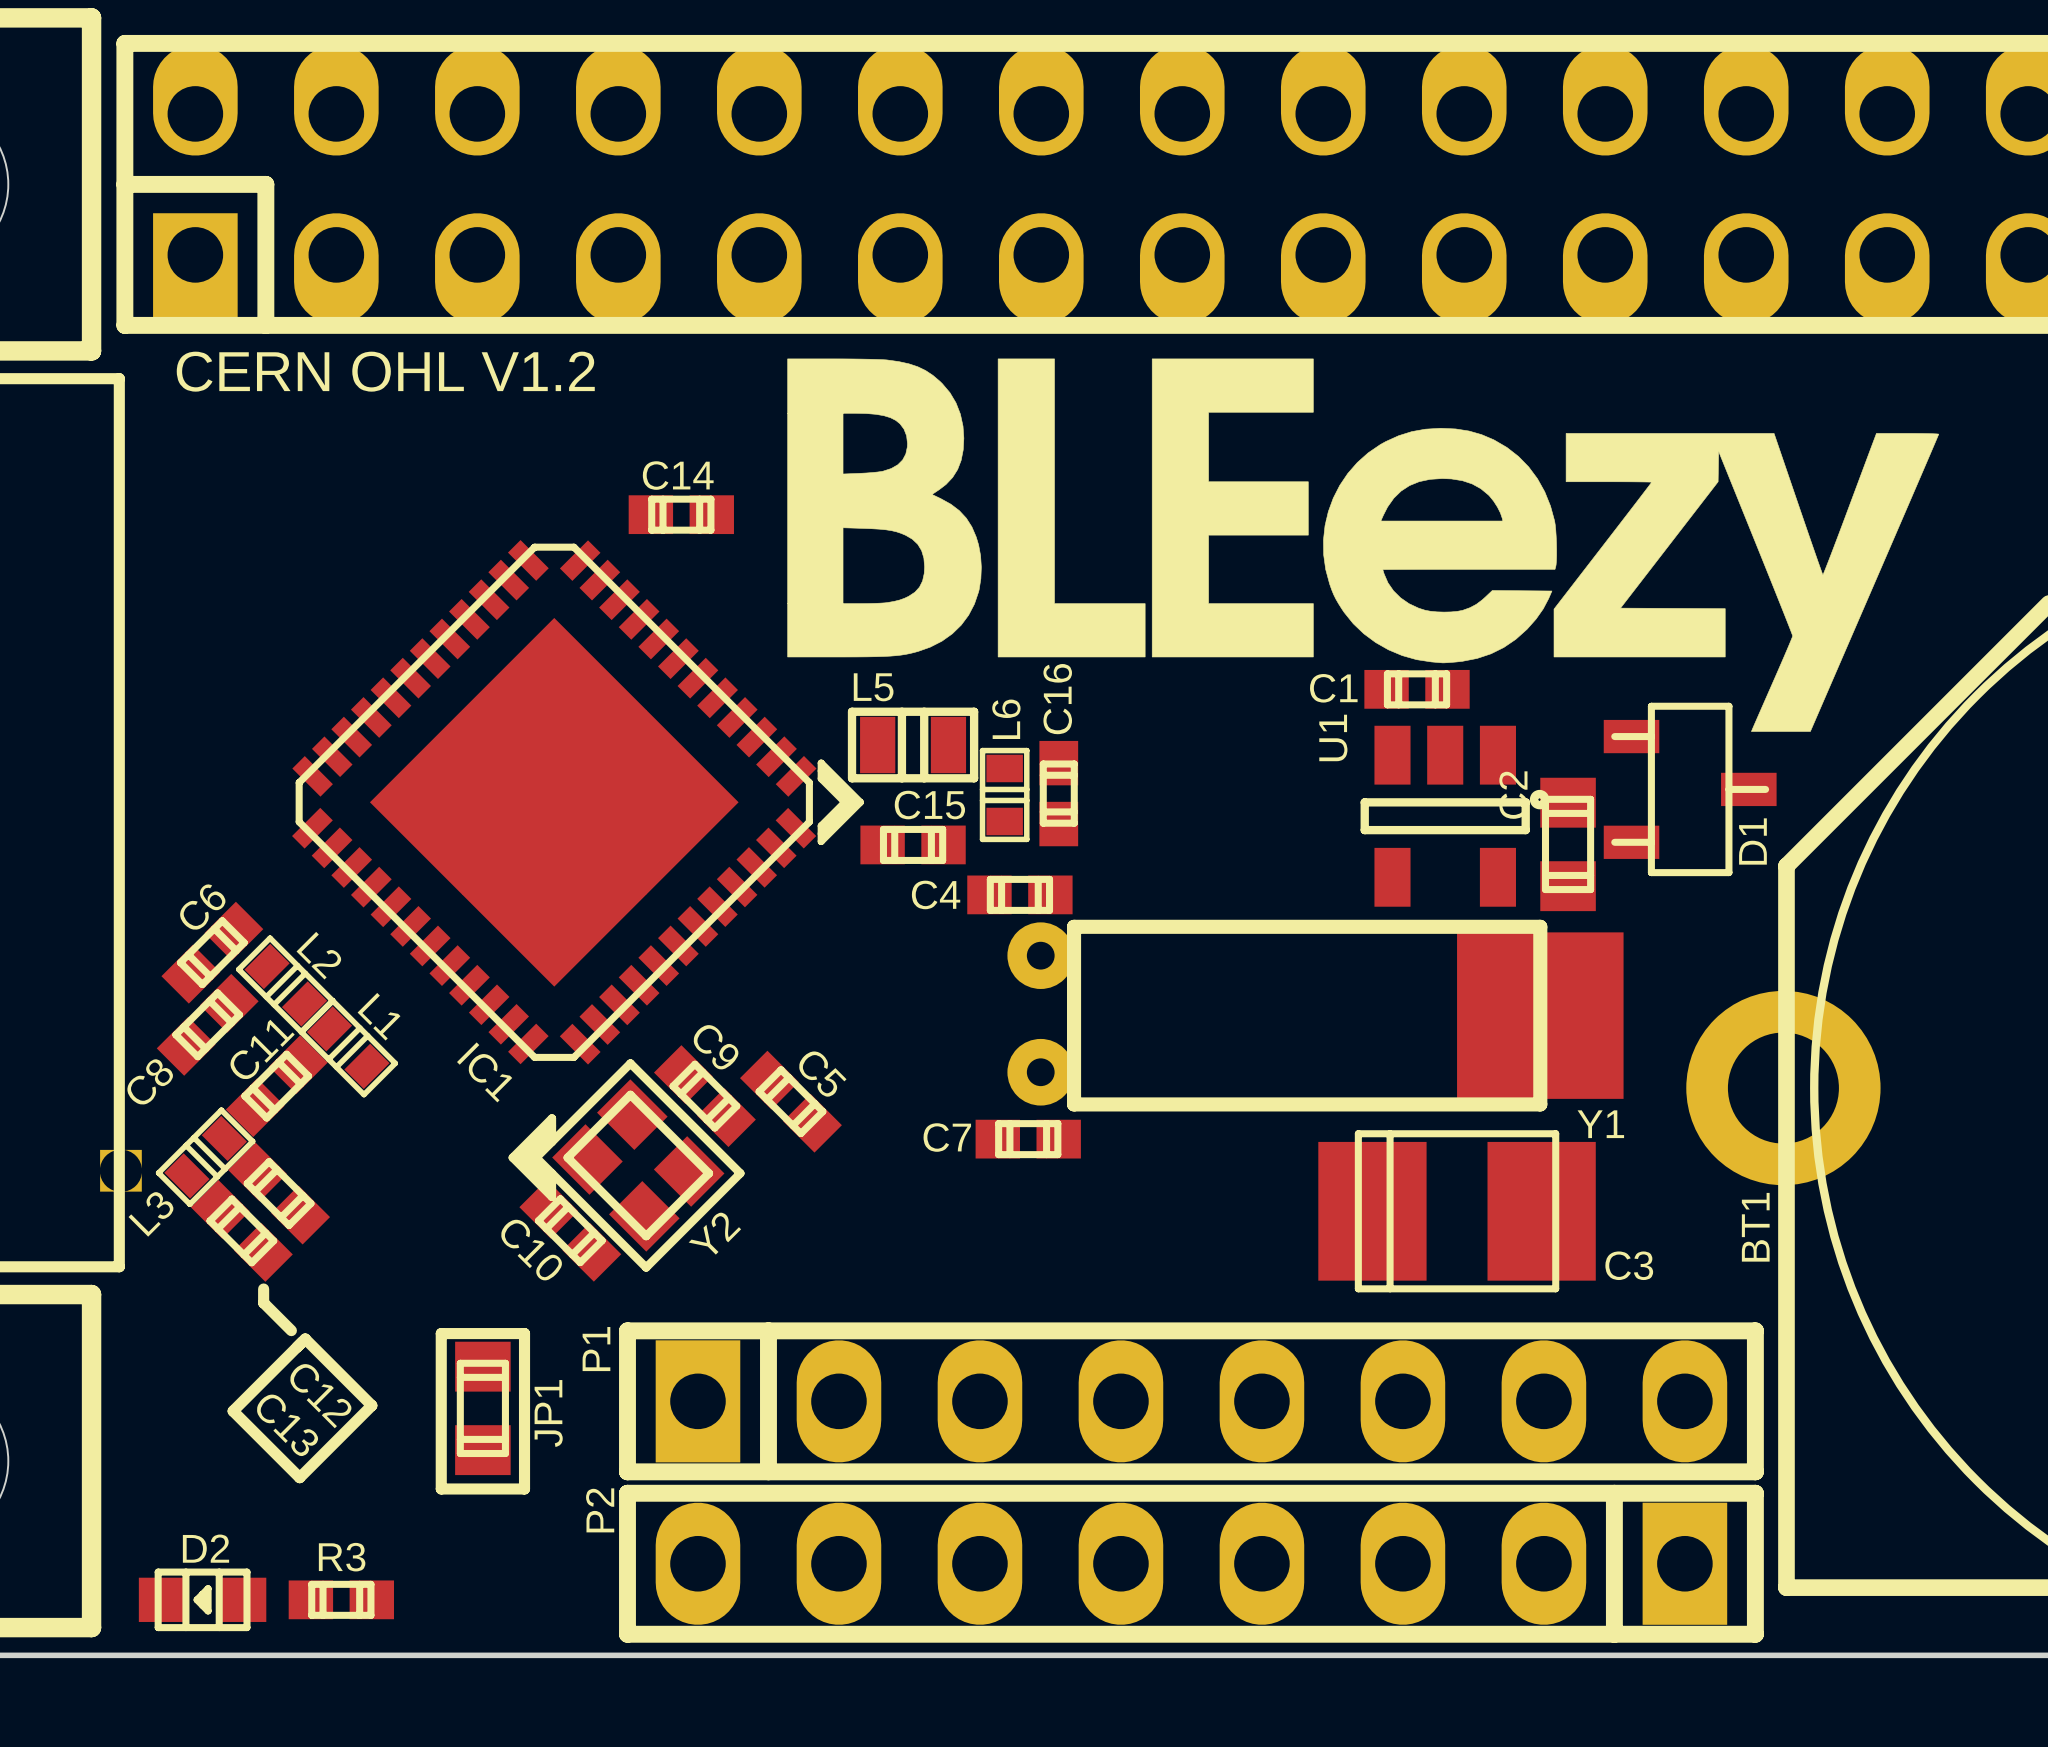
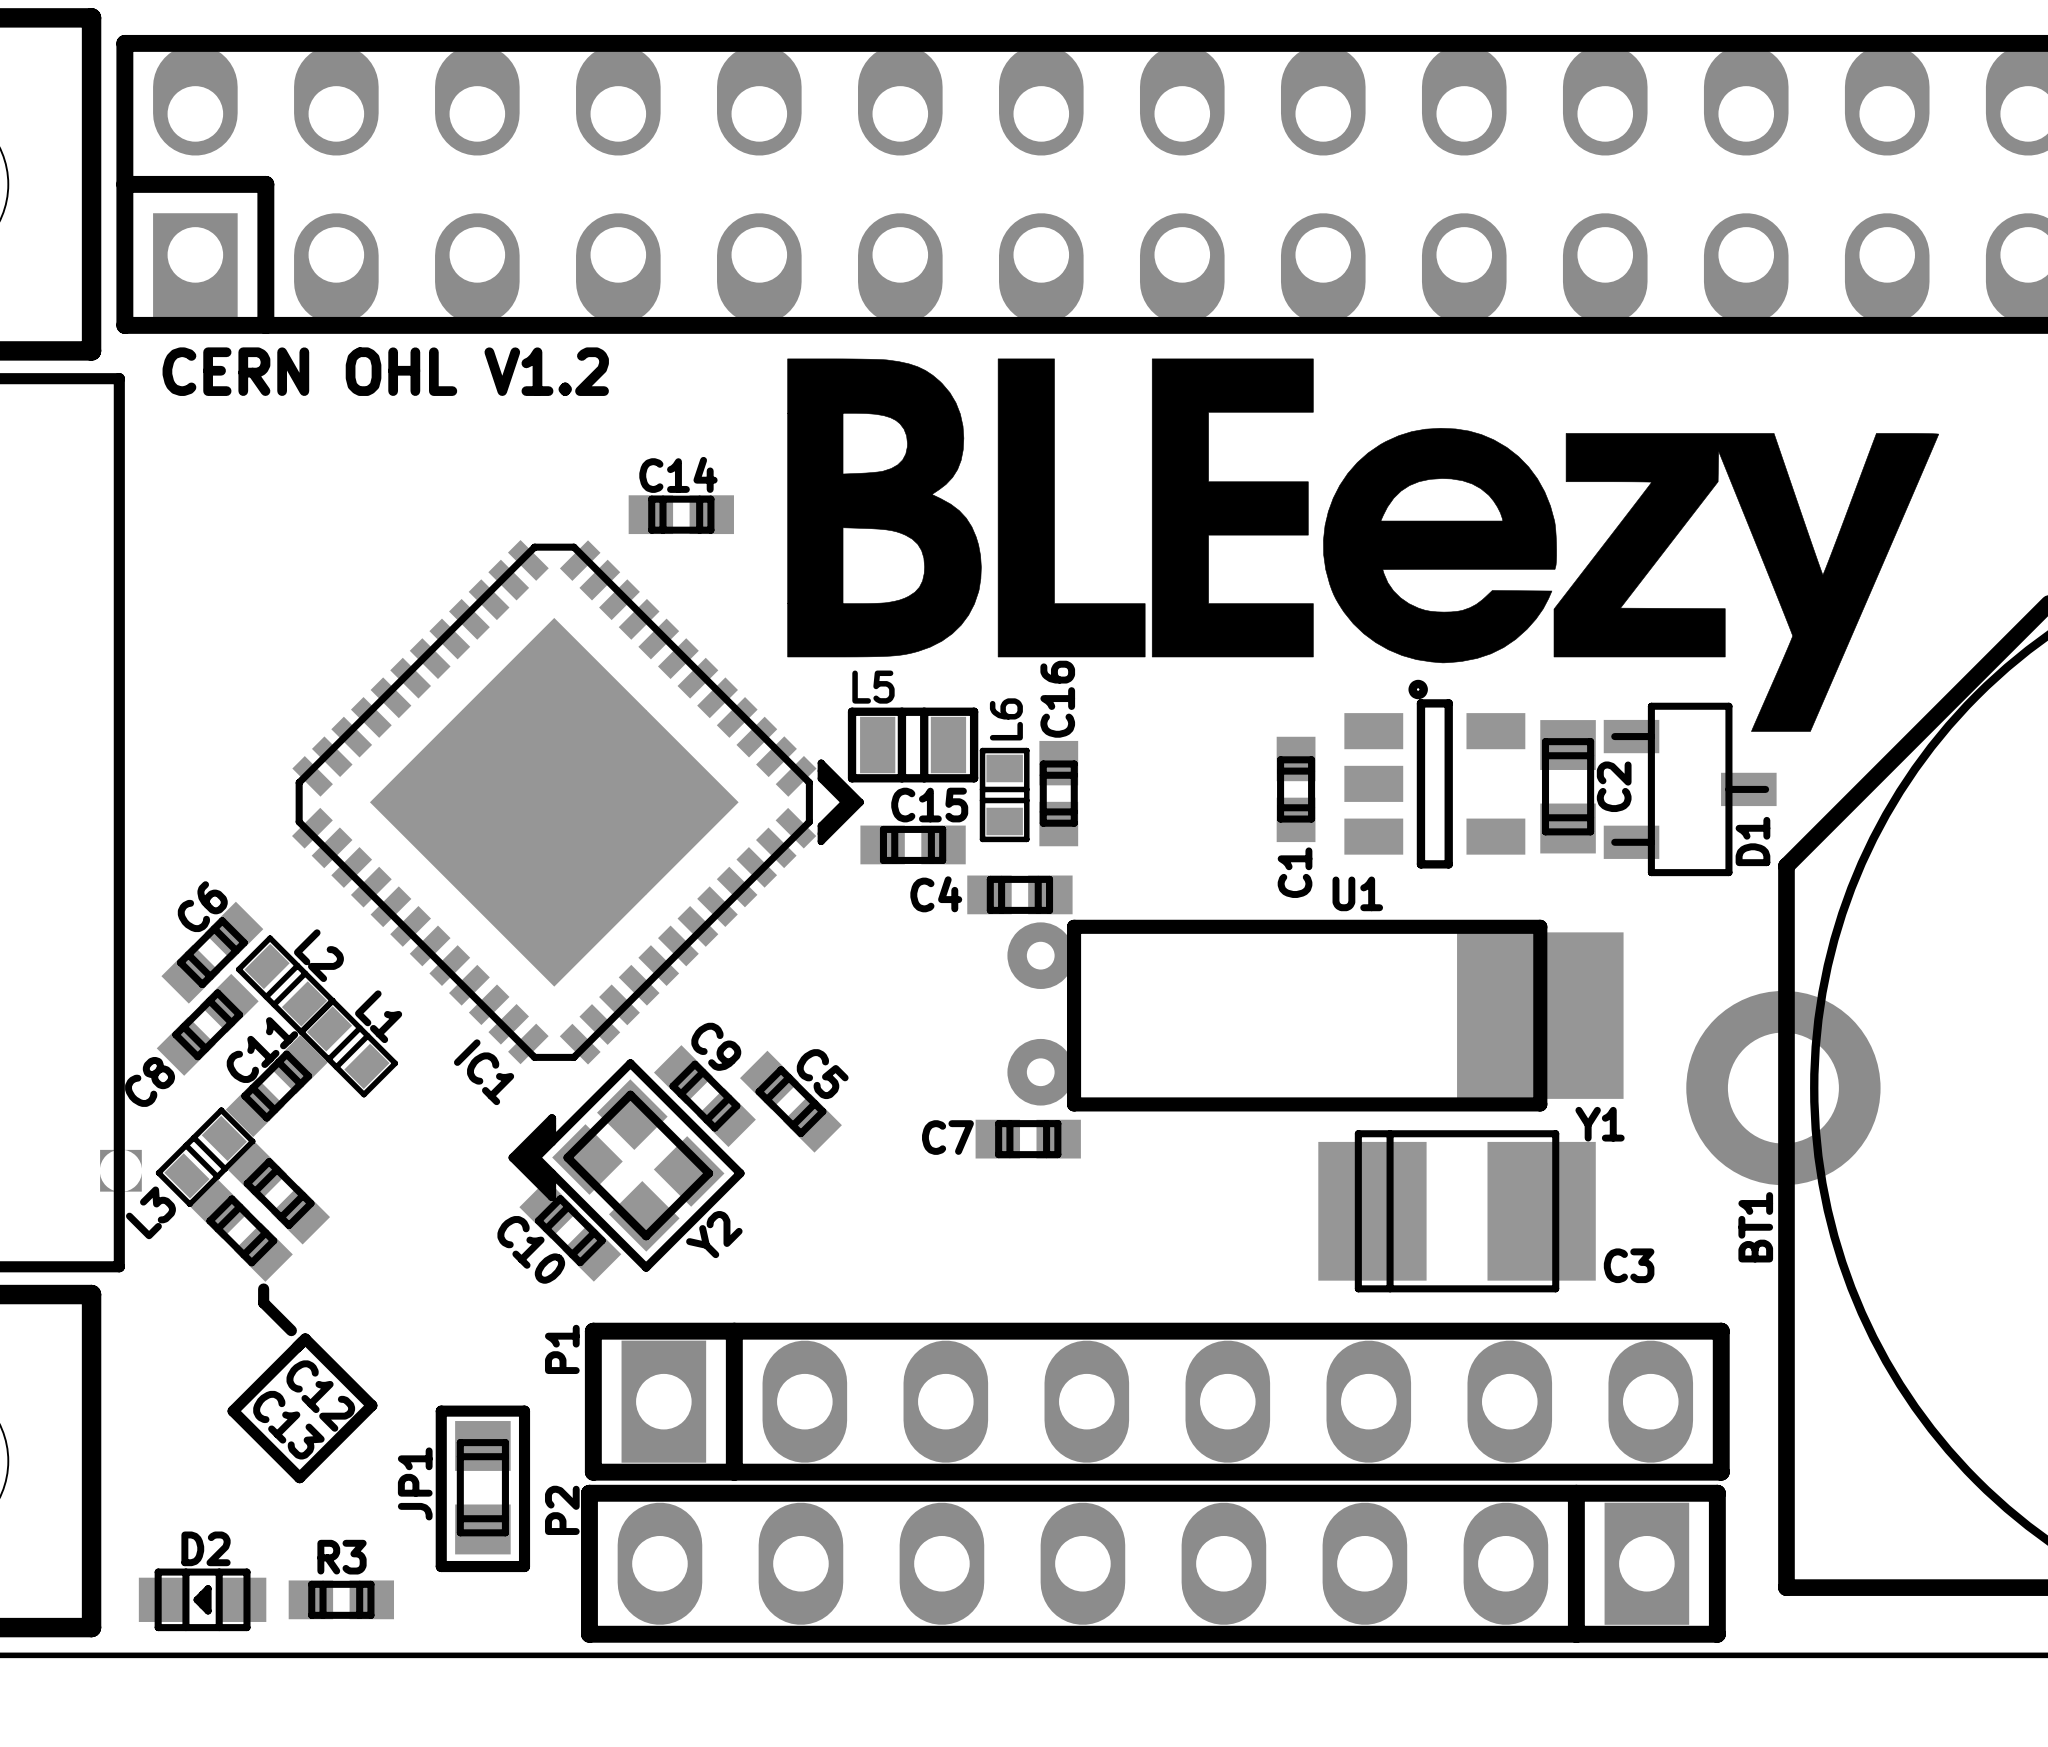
C1 name position: C1 (1333, 688) -> C1 (1295, 872)
C1 rotation: 0° (1417, 689) -> 90° clockwise (1296, 789)
C1 position: (1417, 689) -> (1296, 789)
U1 rotation: 0° (1454, 816) -> 90° counterclockwise (1434, 774)
C2 rotation: 0° (1568, 844) -> 180° (1568, 786)
P1 position: (1191, 1401) -> (1157, 1401)
JP1 rotation: 0° (482, 1408) -> 180° (482, 1487)
line: (441, 1411) (441, 1333) (524, 1333) (524, 1411) -> (441, 1411) (524, 1411)
line: (441, 1488) (524, 1488) -> (441, 1488) (441, 1566) (524, 1566) (524, 1488)
P2 position: (1191, 1563) -> (1153, 1563)

